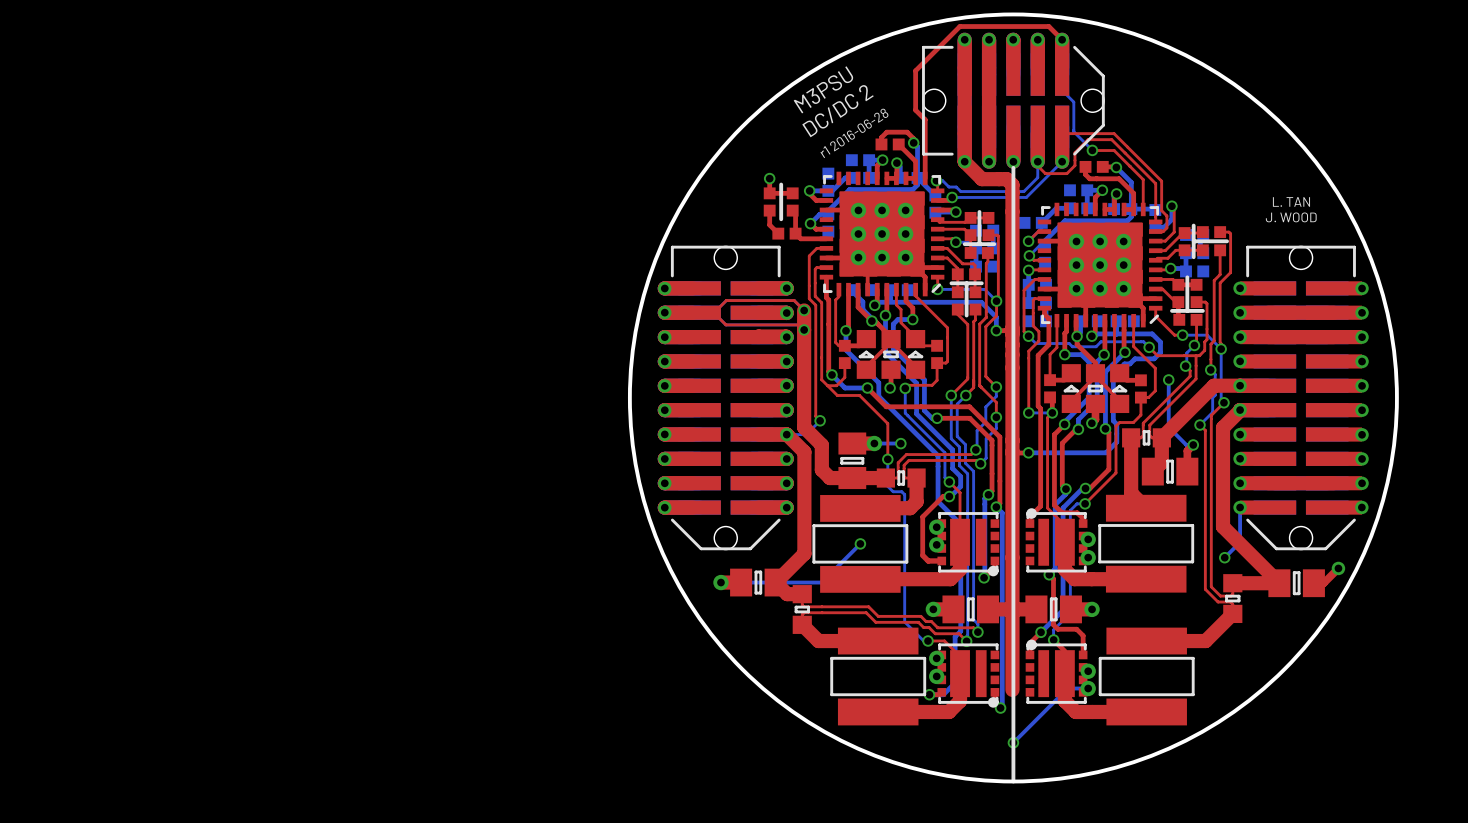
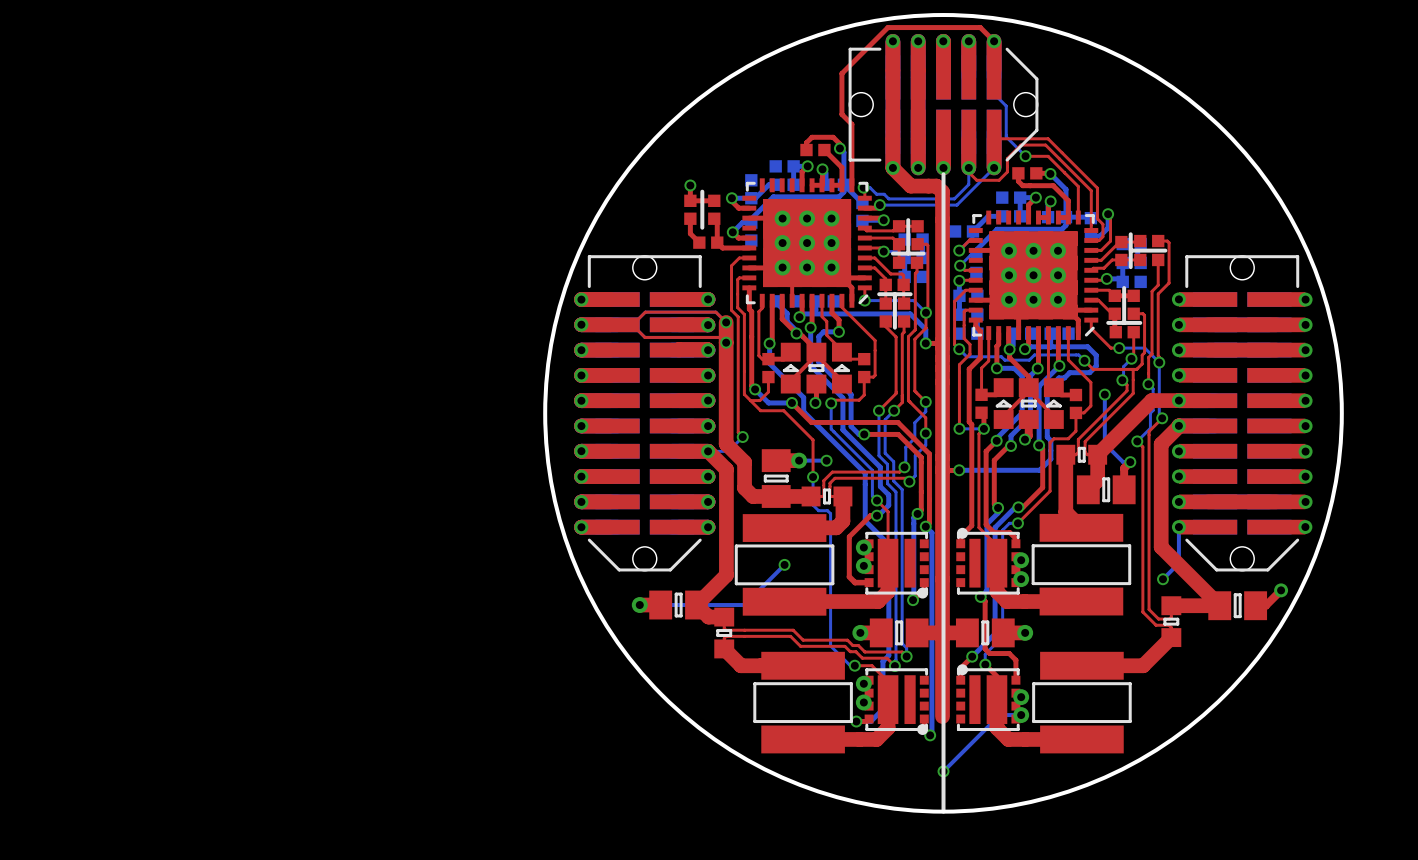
text: M3PSU (823, 89) -> none
text: DC/DC 2 (837, 111) -> none
text: r1 2016-06-28 (854, 133) -> none
text: L. TAN (1291, 201) -> none
text: J. WOOD (1291, 217) -> none

